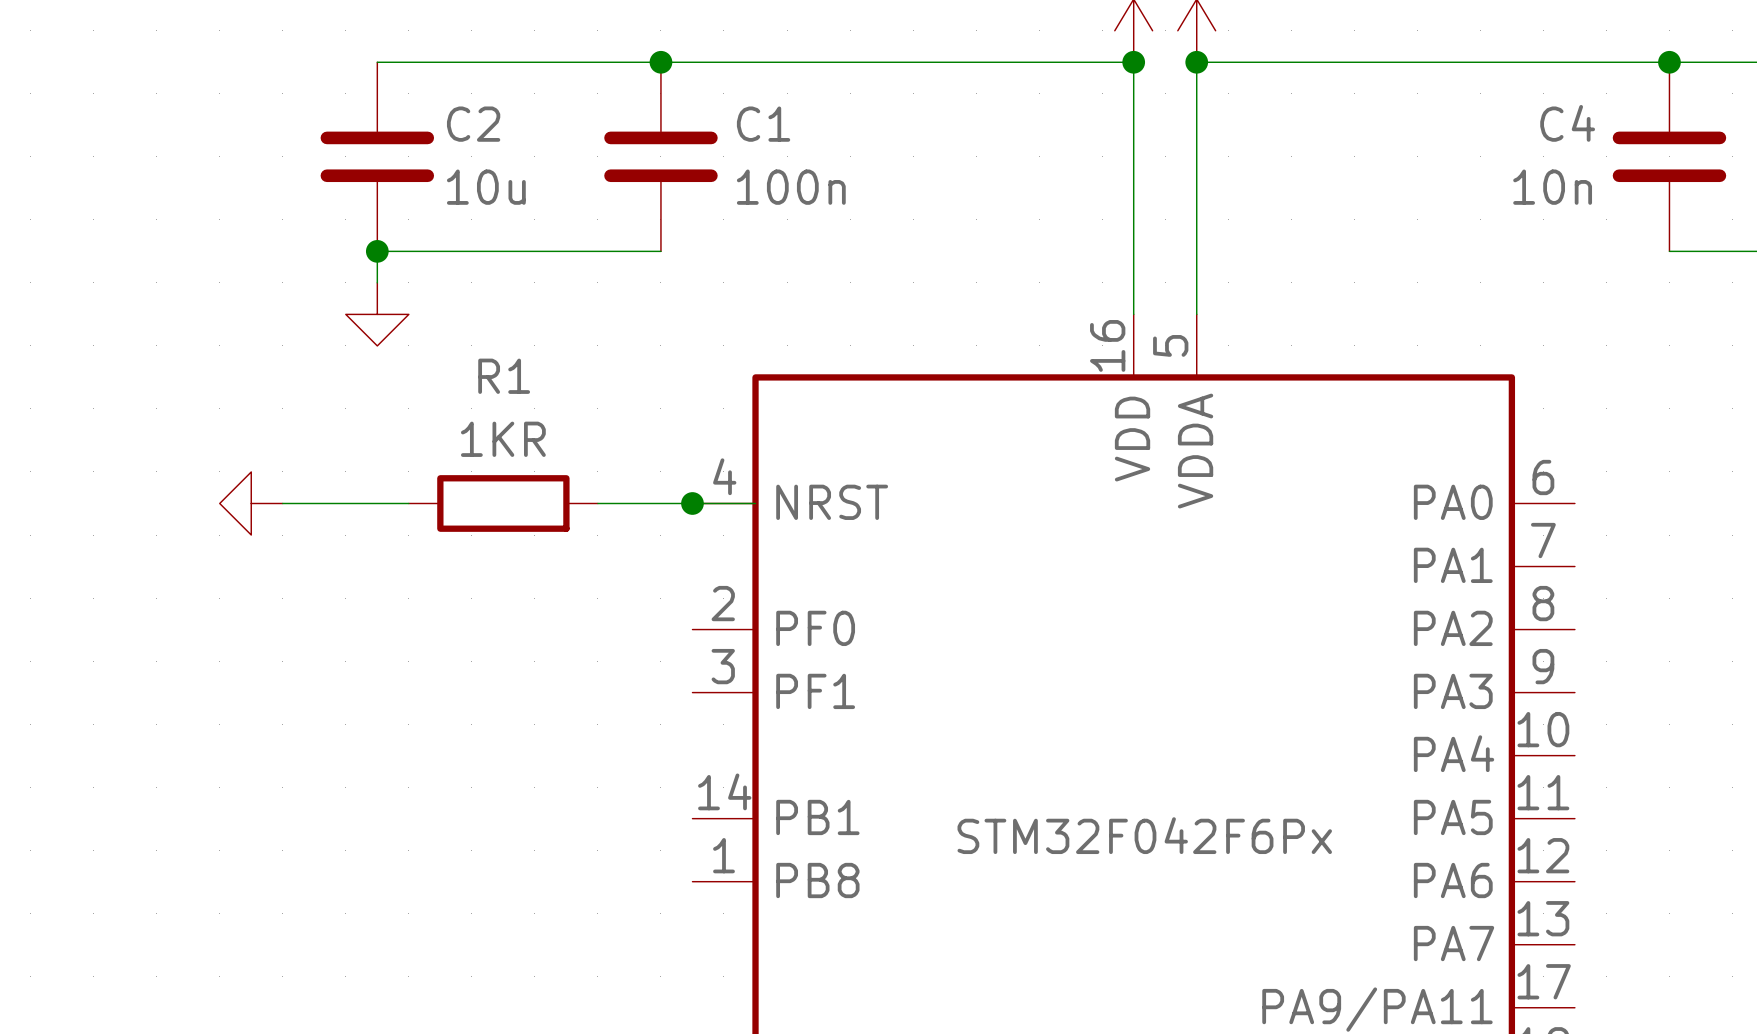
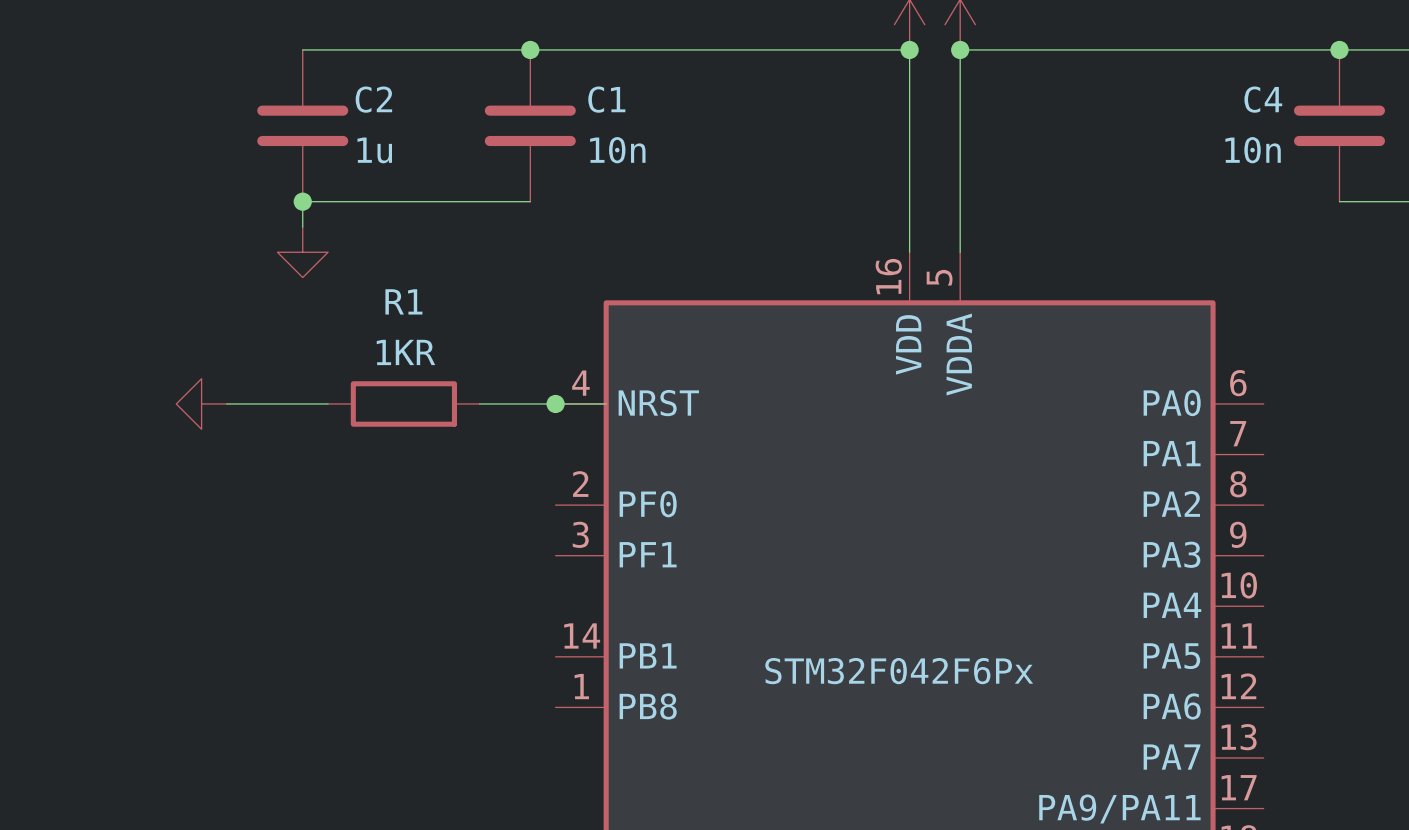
C2 value: 10u (486, 187) -> 1u (374, 150)
C1 value: 100n (791, 187) -> 10n (617, 150)

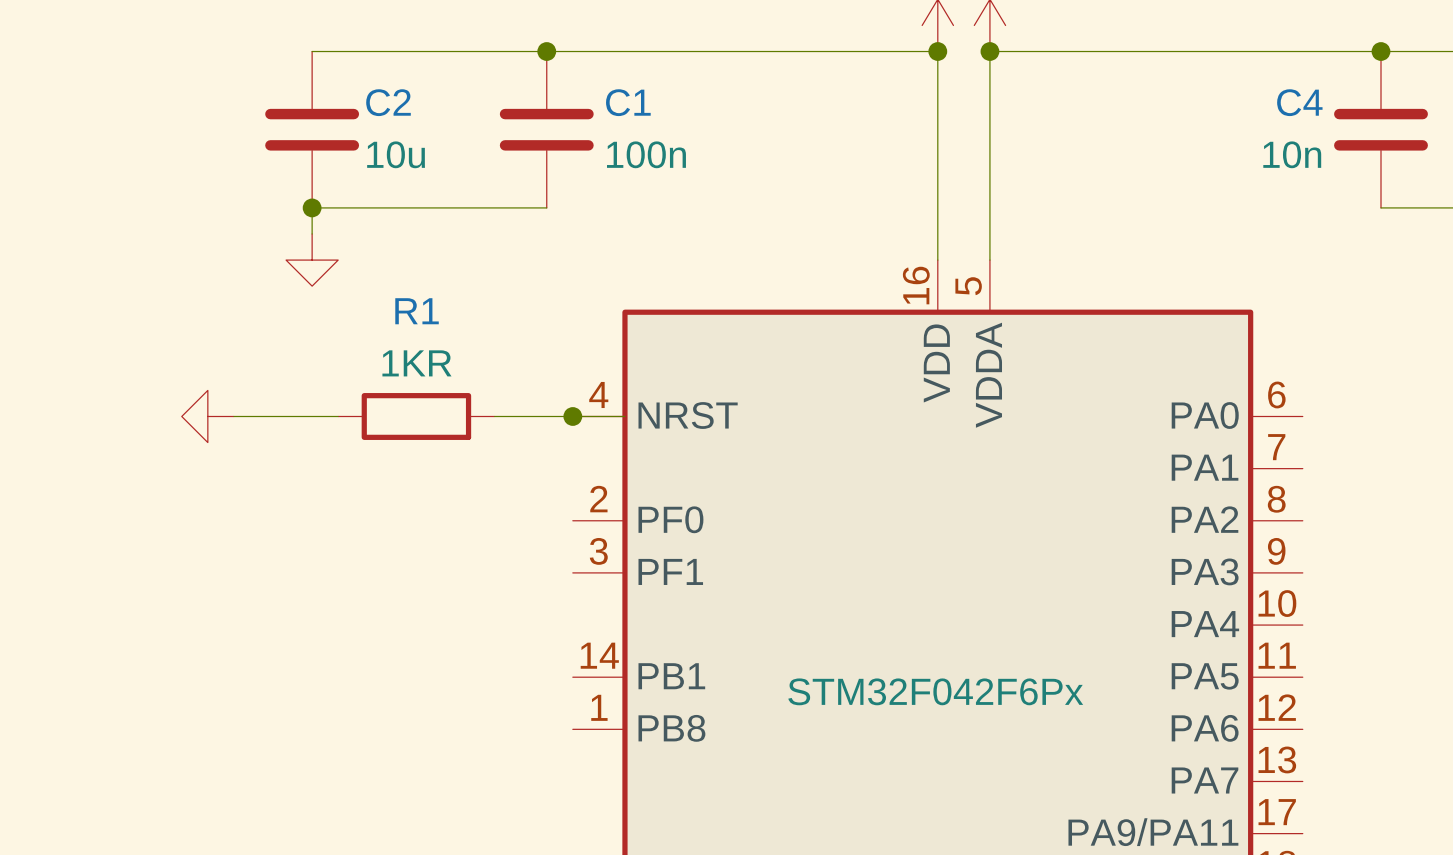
C2 value: 1u (374, 150) -> 10u (396, 154)
C1 value: 10n (617, 150) -> 100n (646, 154)

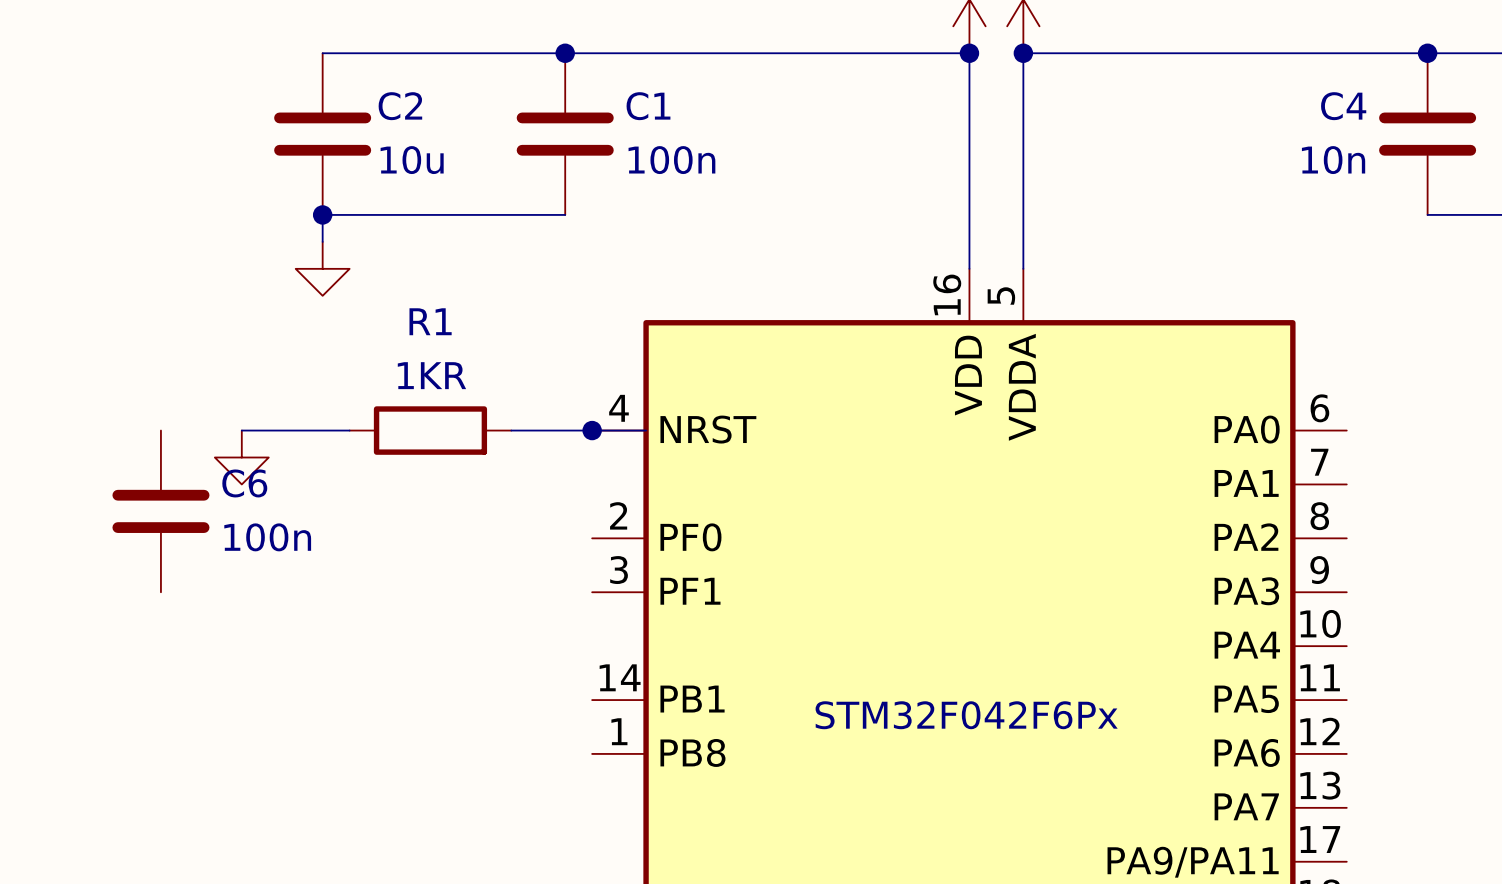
power symbol rotation: 0° (207, 416) -> 90° counterclockwise (241, 457)
power symbol position: (207, 416) -> (241, 457)
C6: none -> 100n (160, 511)

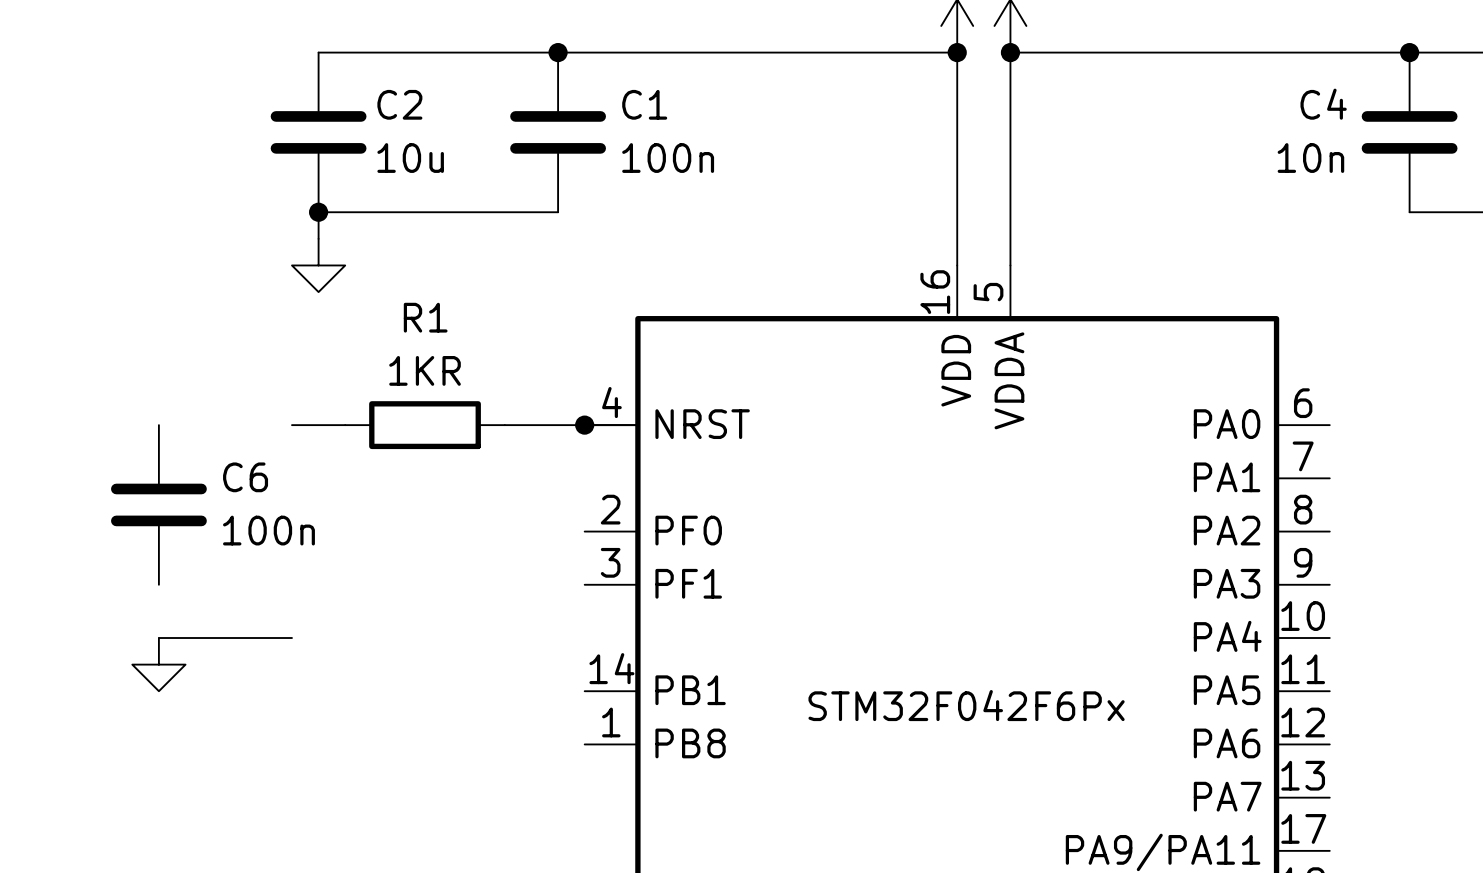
wire: (241, 430) (295, 430) -> none
power symbol position: (241, 457) -> (158, 664)
wire: none -> (158, 638) (291, 638)

